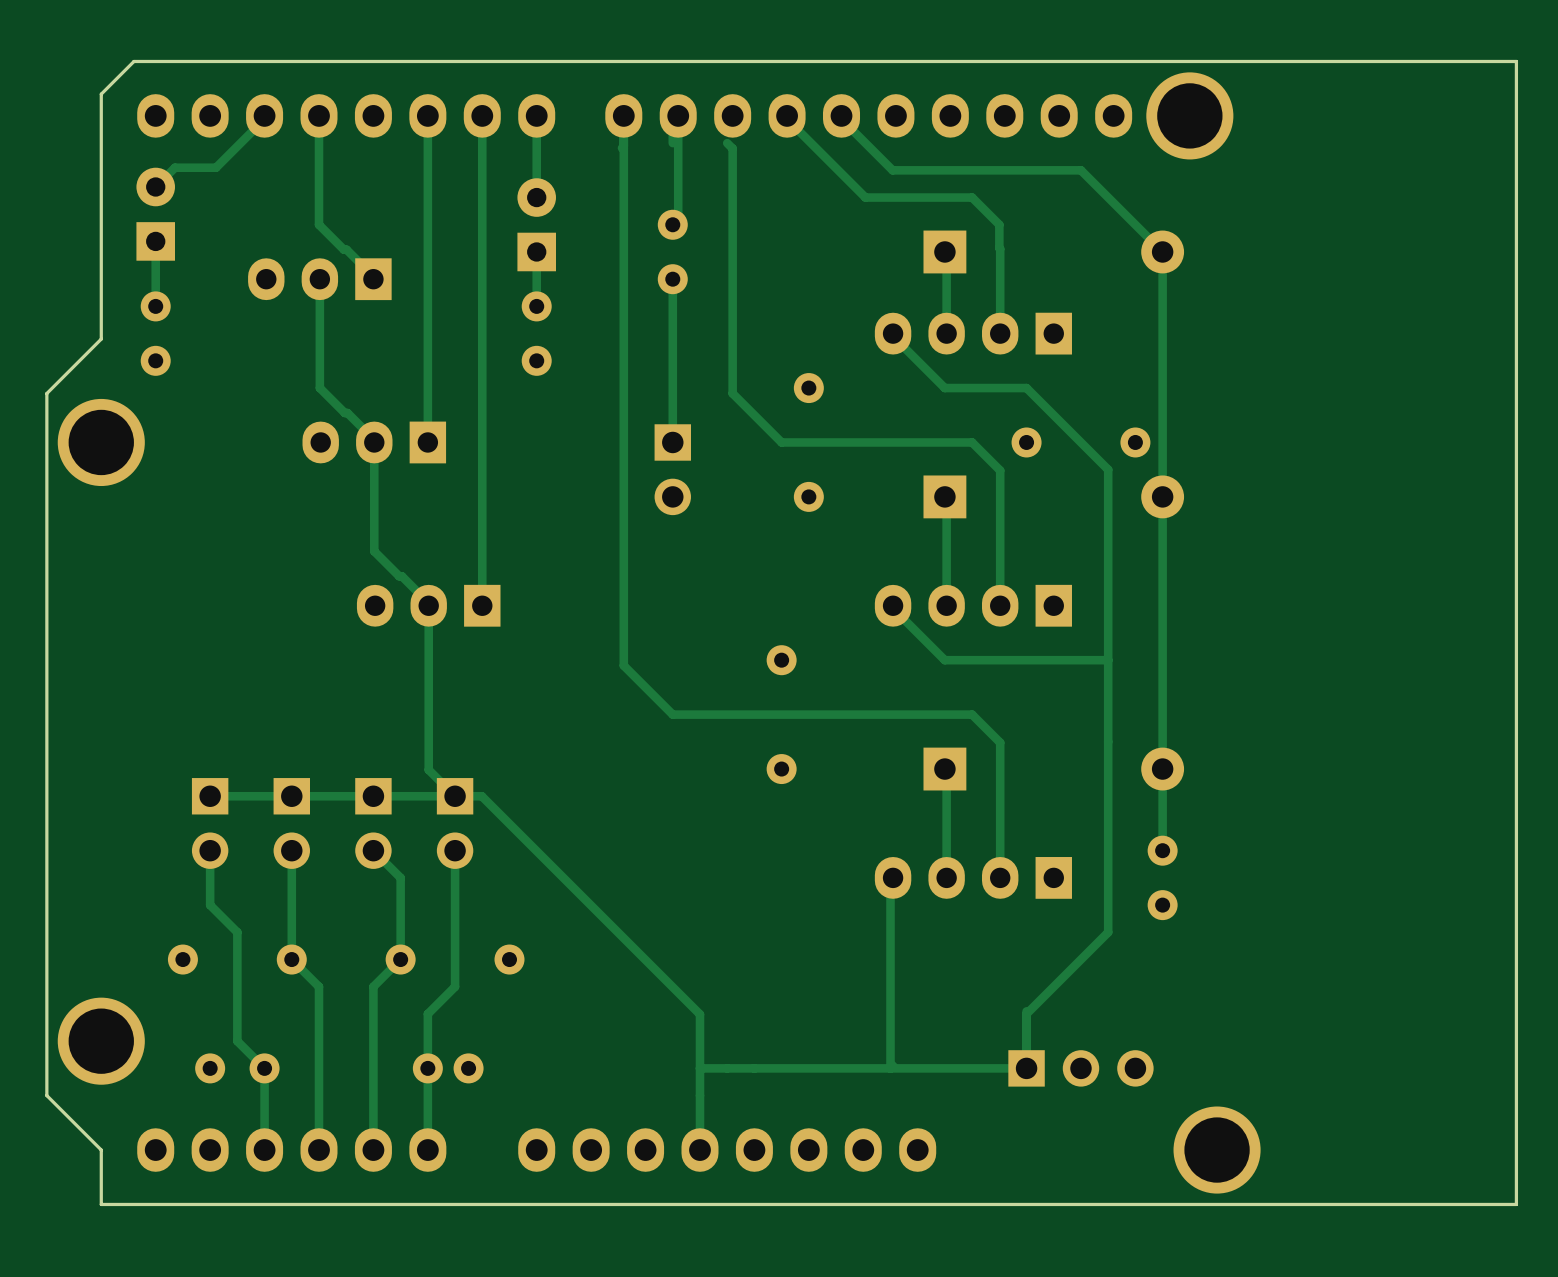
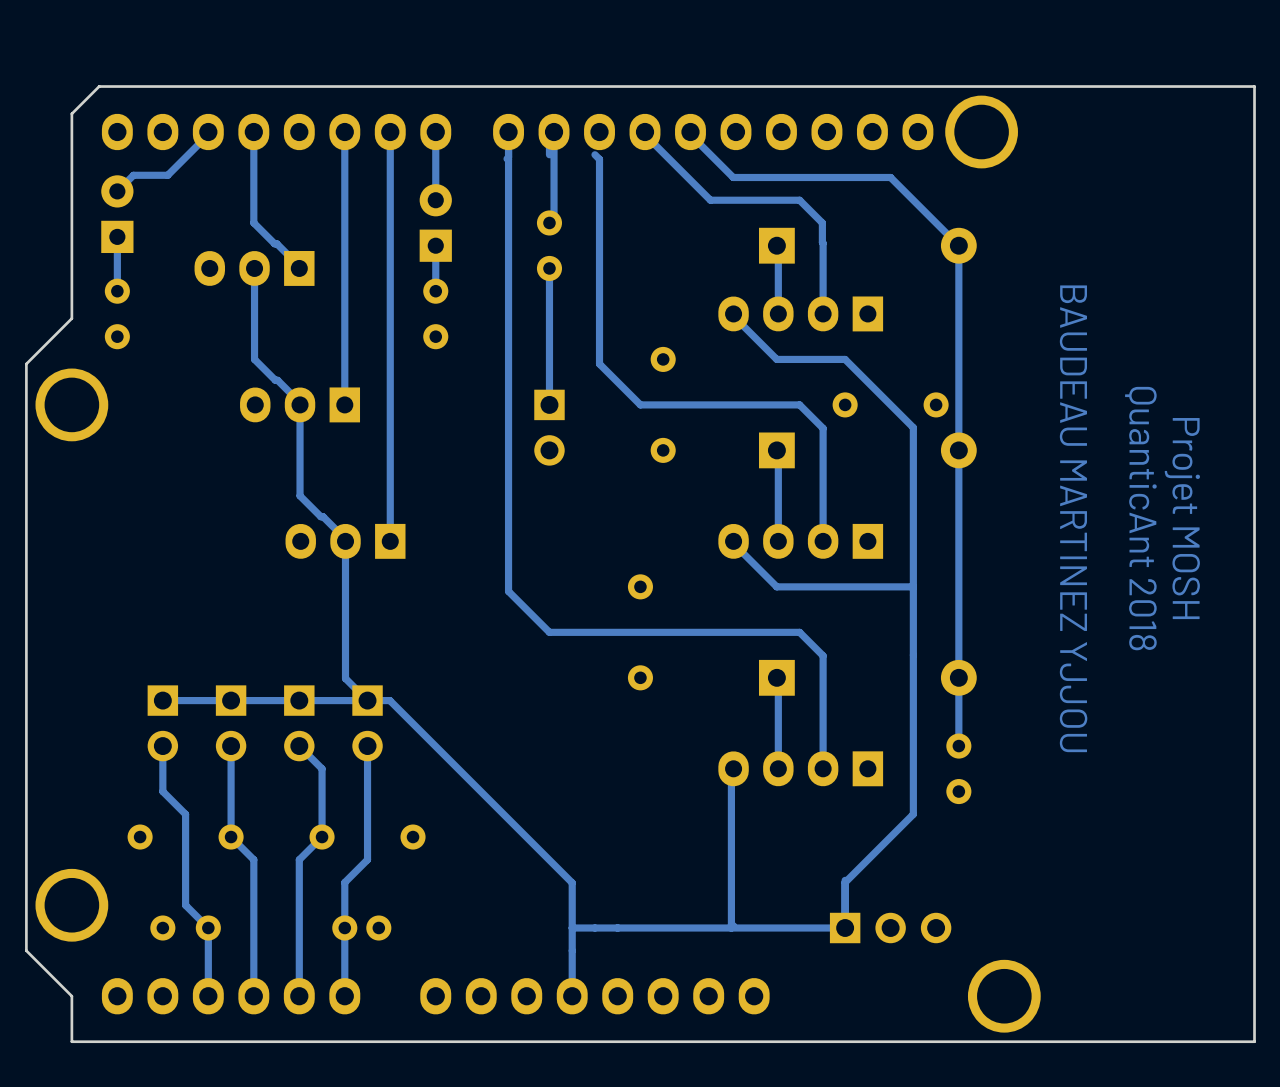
text: none -> BAUDEAU MARTINEZ YJJOU (1073, 518)
text: none -> QuanticAnt 2018 (1140, 518)
text: none -> Projet MOSH (1182, 518)

